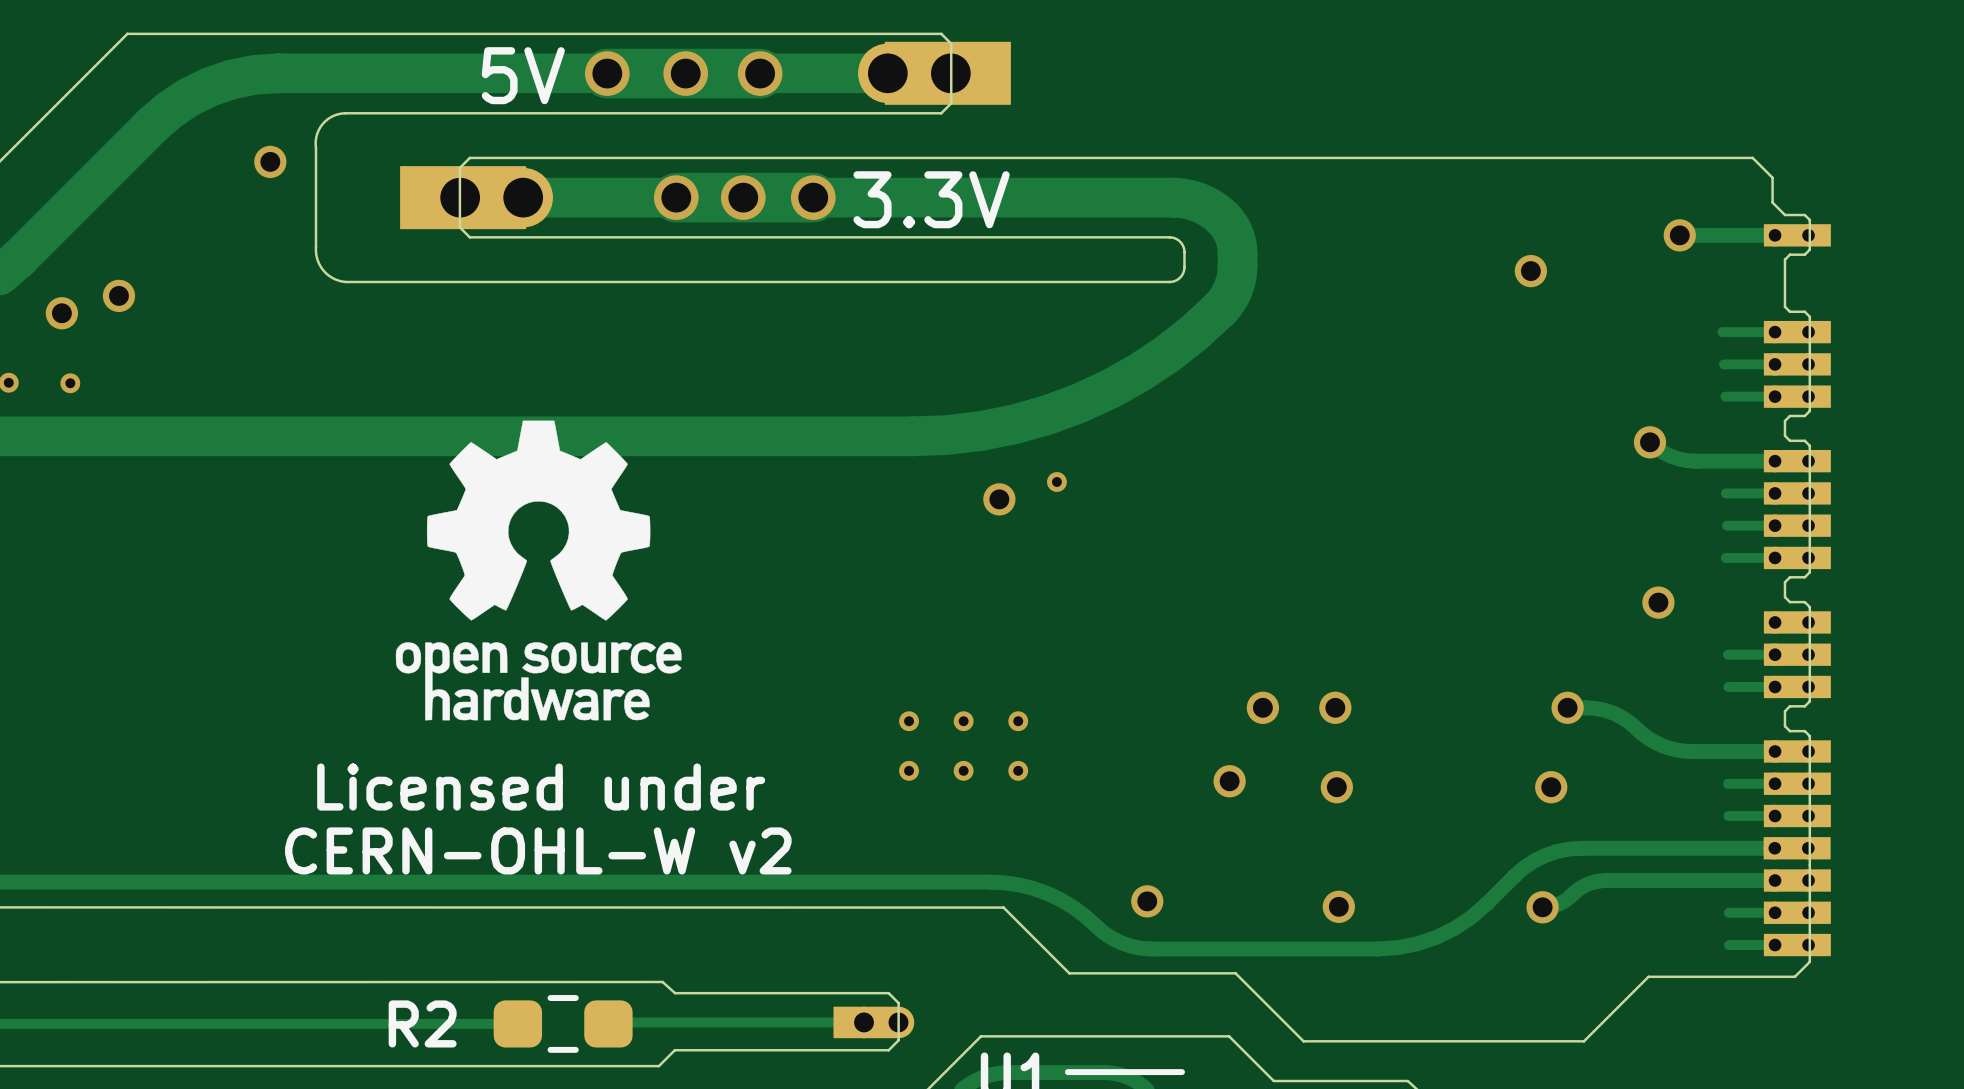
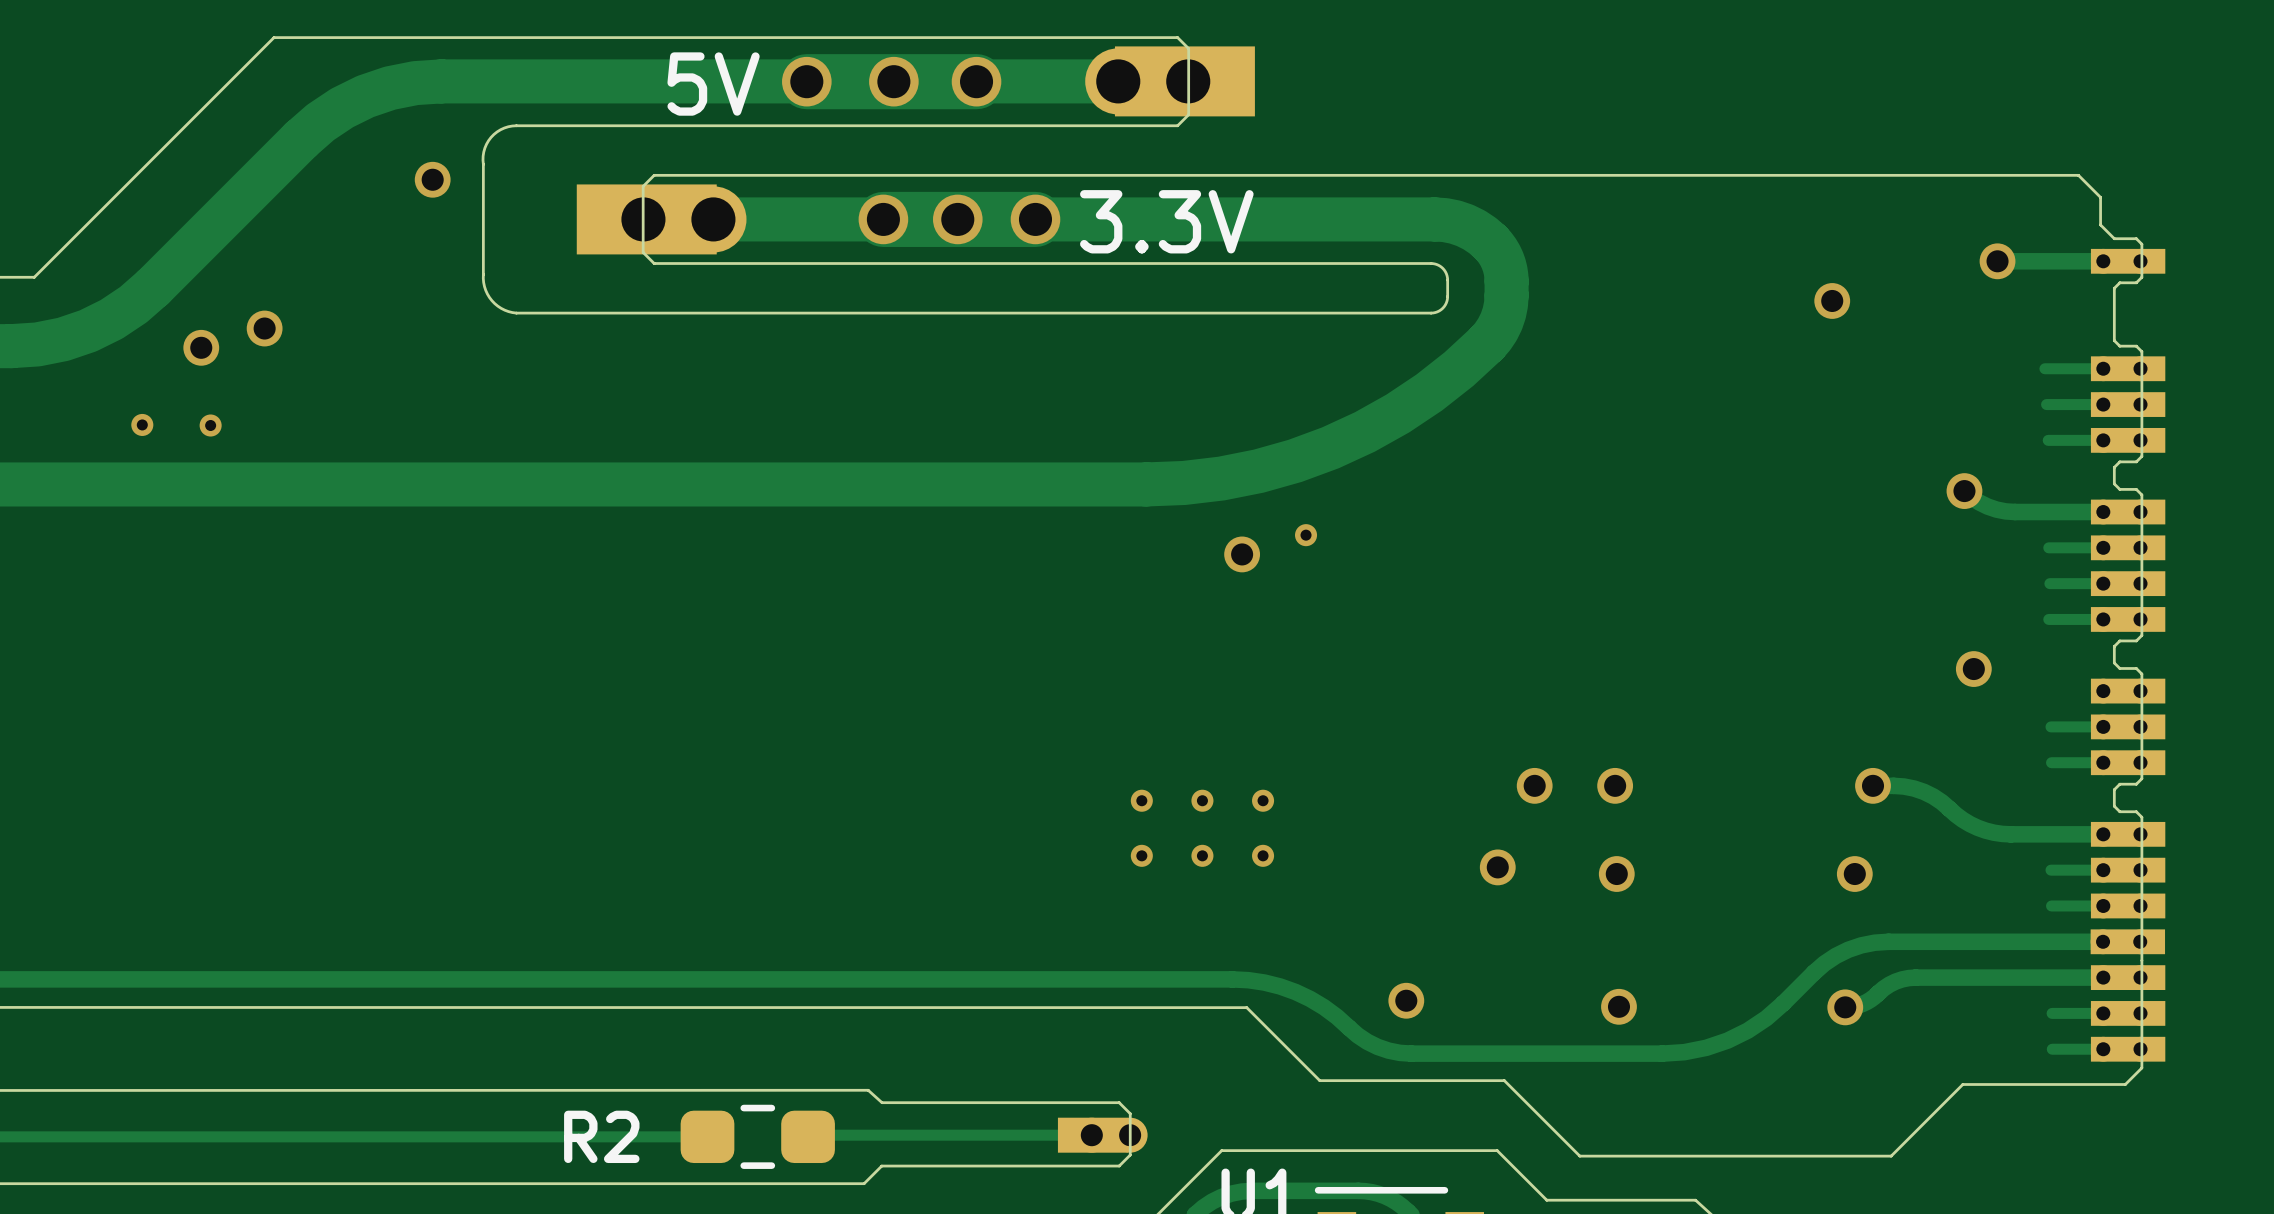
drawing: [395, 420, 682, 721] -> none
text: Licensed under (541, 787) -> none
text: CERN-OHL-W v2 (538, 850) -> none

